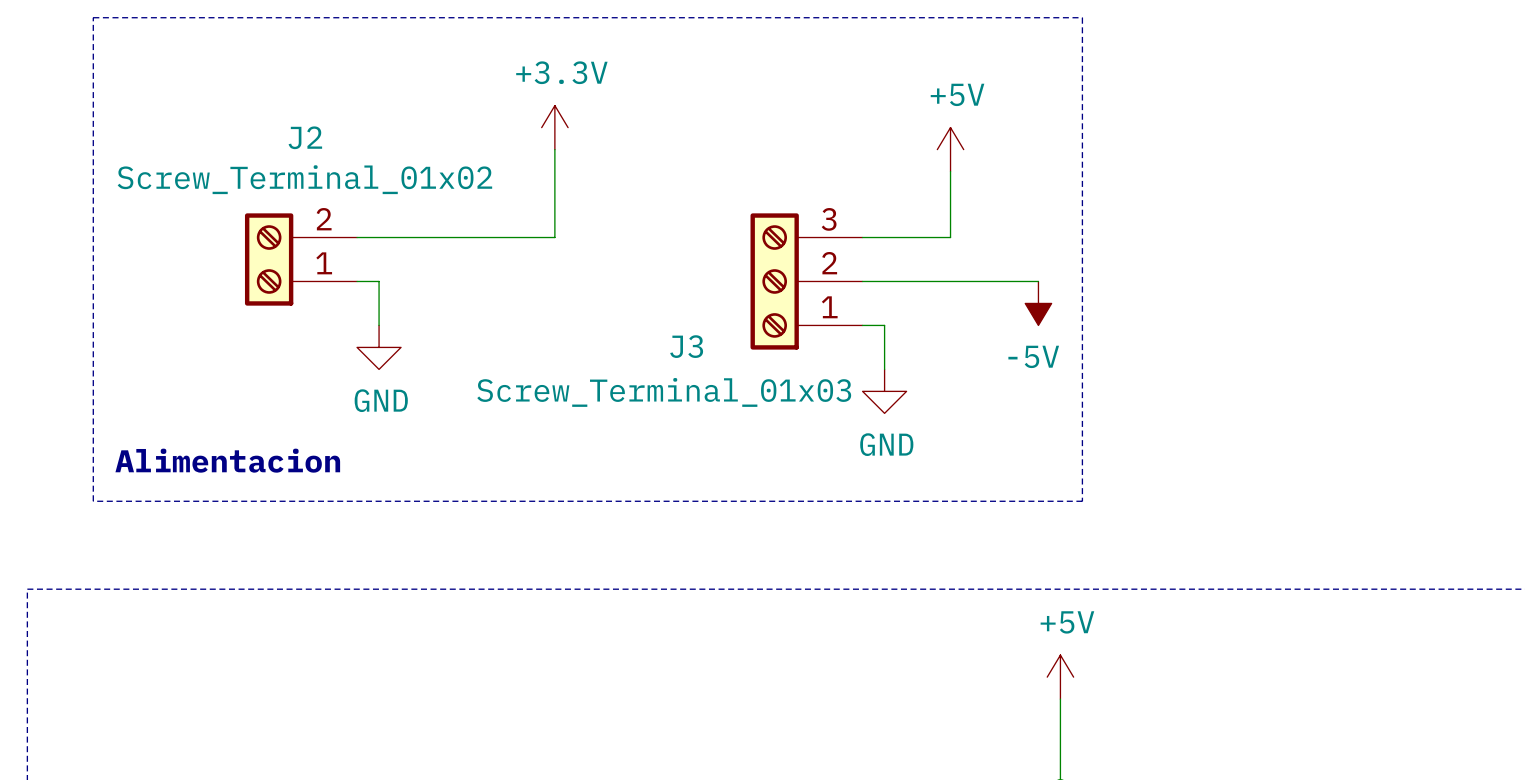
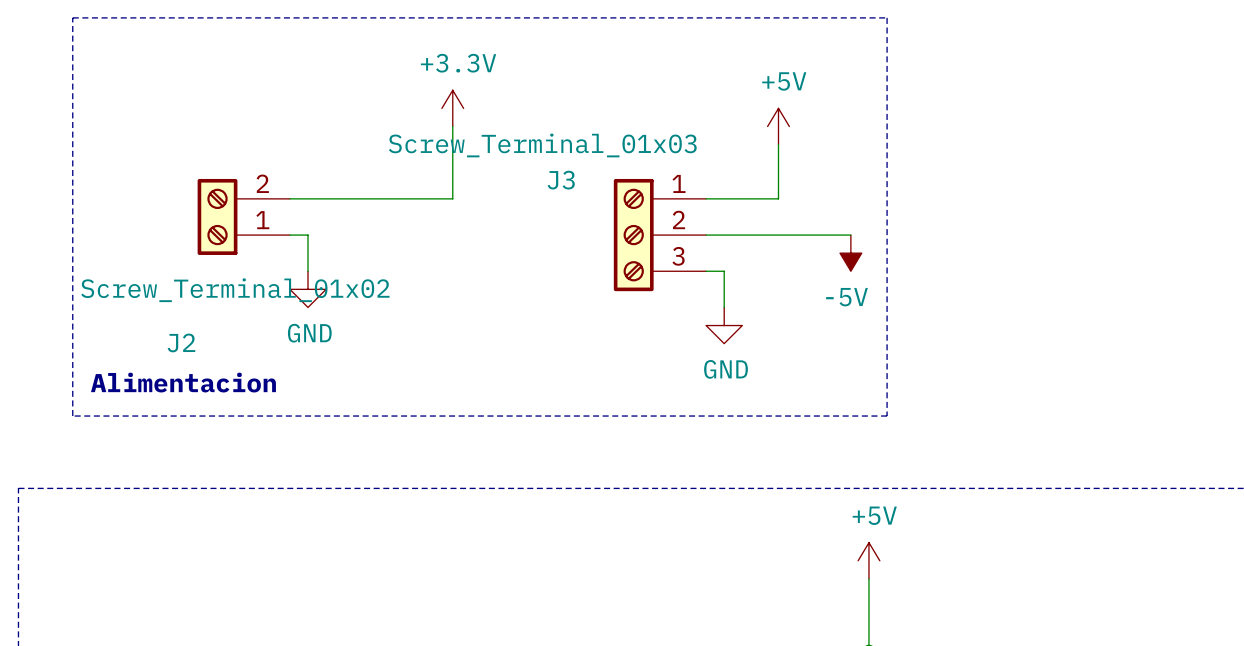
J2 name position: J2 (305, 137) -> J2 (181, 342)
J2 value position: Screw_Terminal_01x02 (304, 179) -> Screw_Terminal_01x02 (235, 290)
J3 flip: as is (774, 281) -> up-down (633, 235)

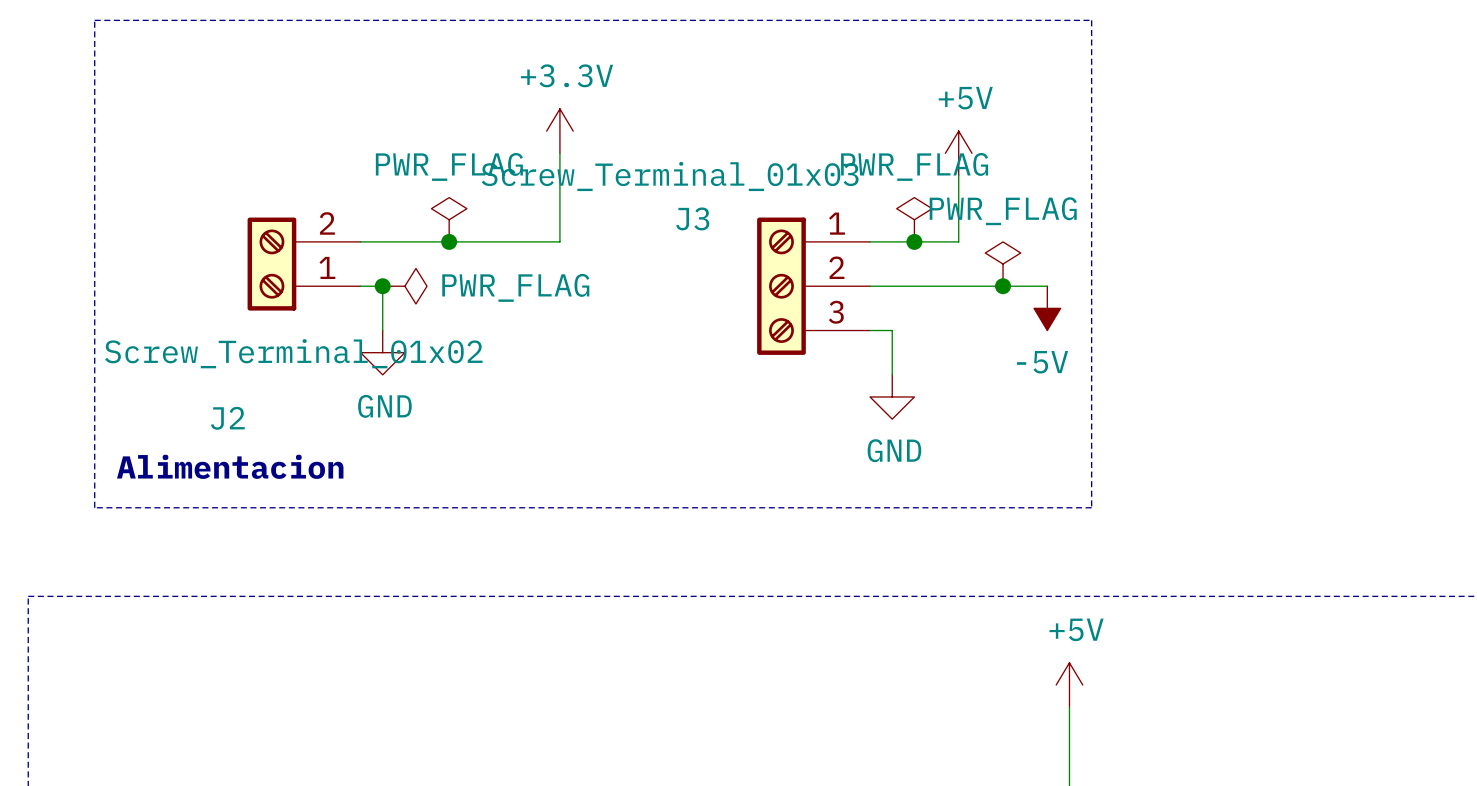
power symbol: none -> PWR_FLAG (449, 219)
power symbol: none -> PWR_FLAG (914, 219)
junction: none -> (449, 241)
junction: none -> (914, 241)
power symbol: none -> PWR_FLAG (1003, 264)
junction: none -> (382, 286)
power symbol: none -> PWR_FLAG (404, 286)
junction: none -> (1003, 286)

